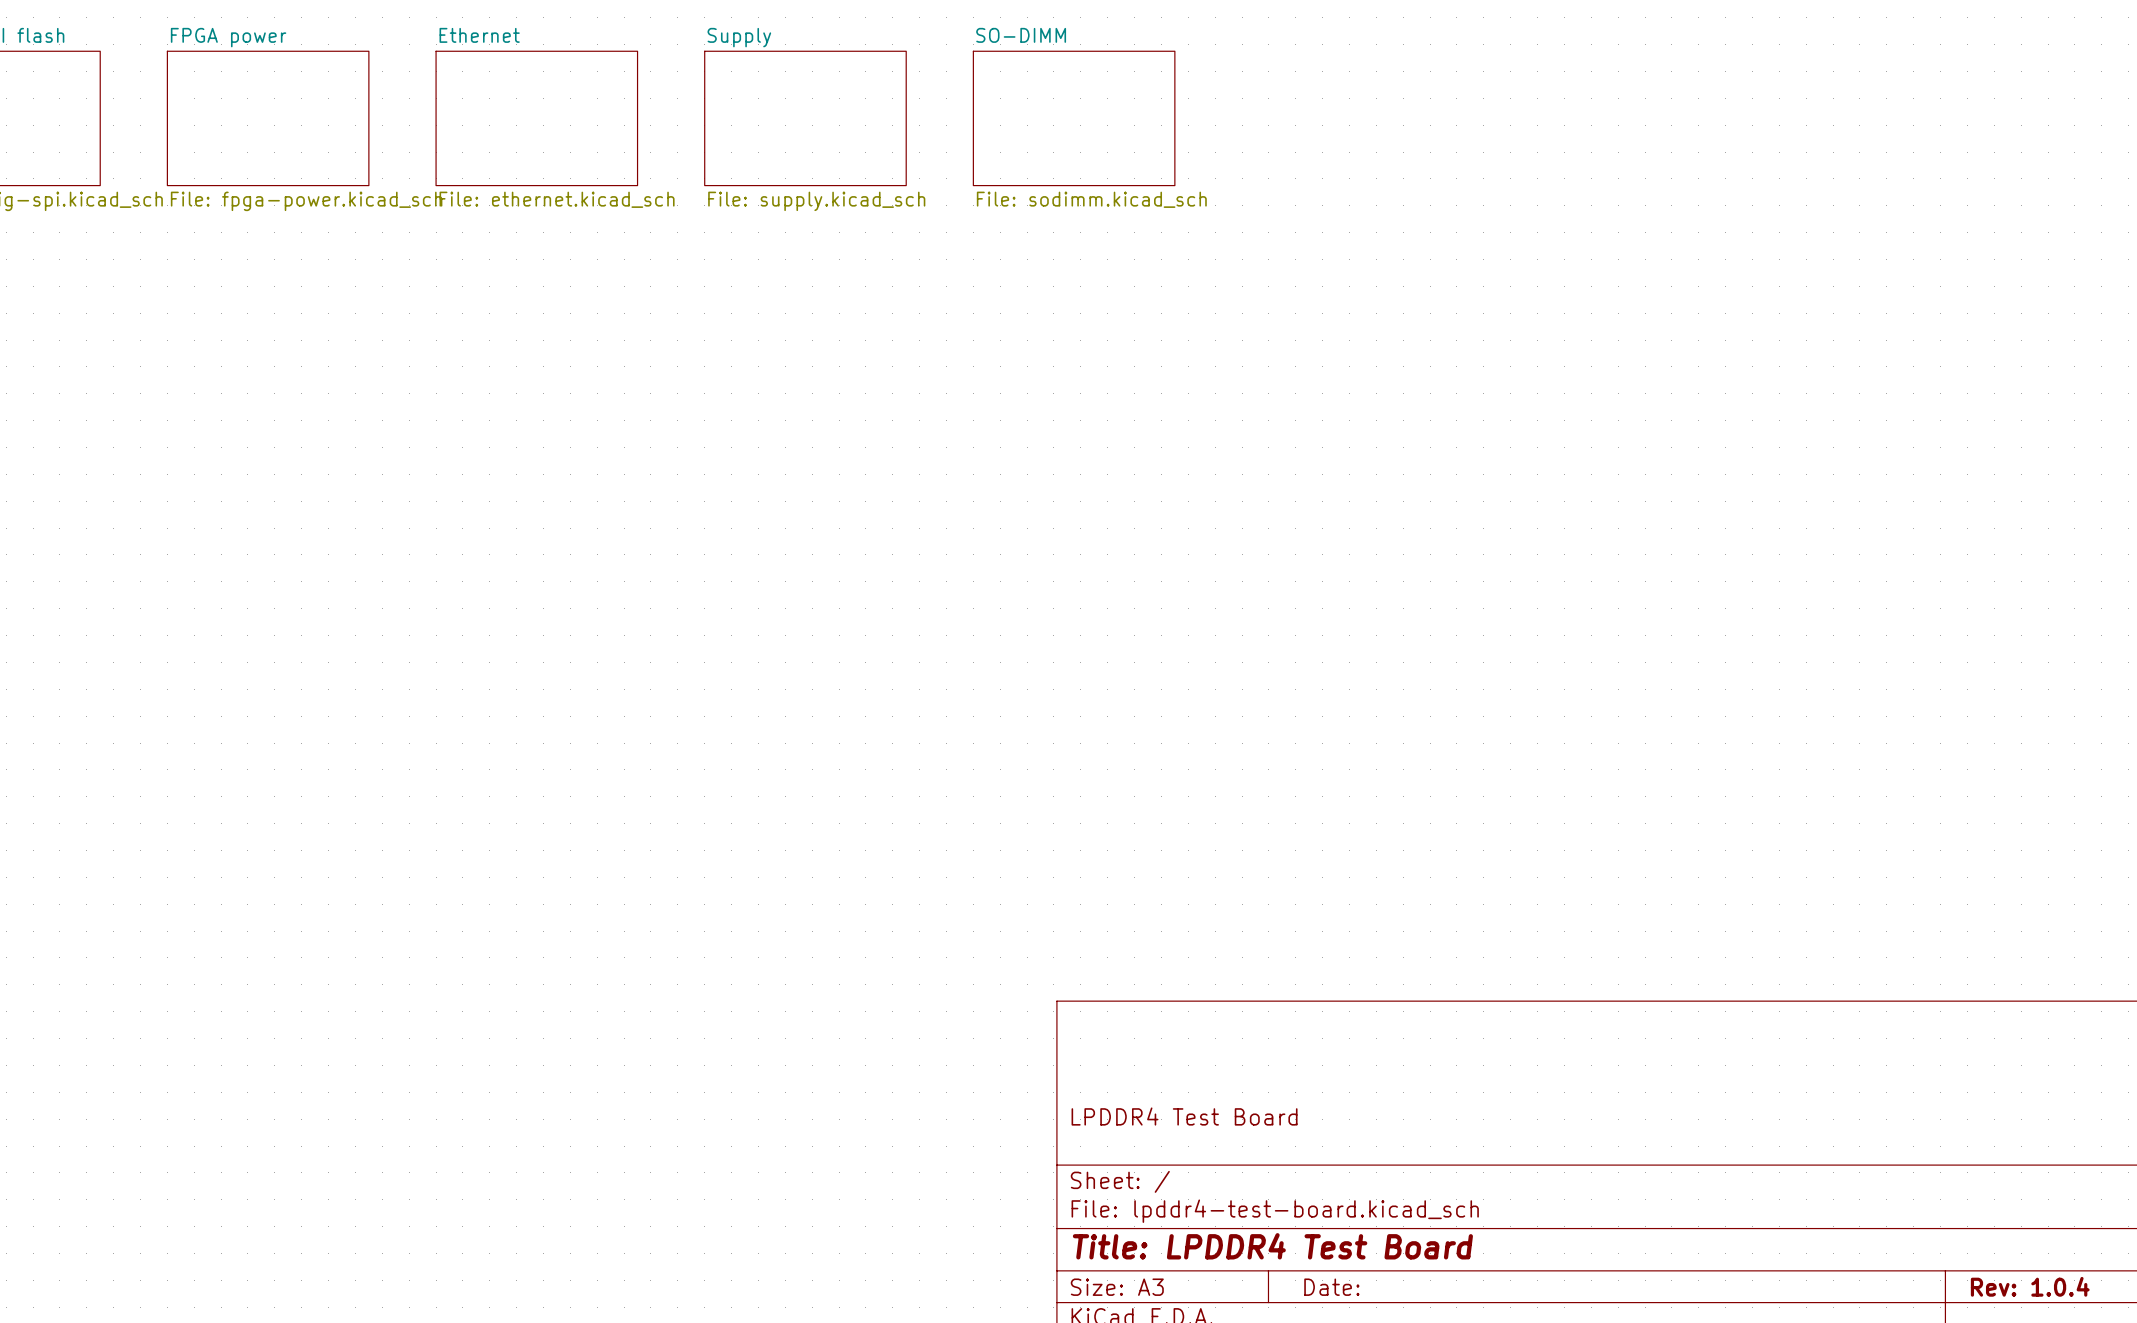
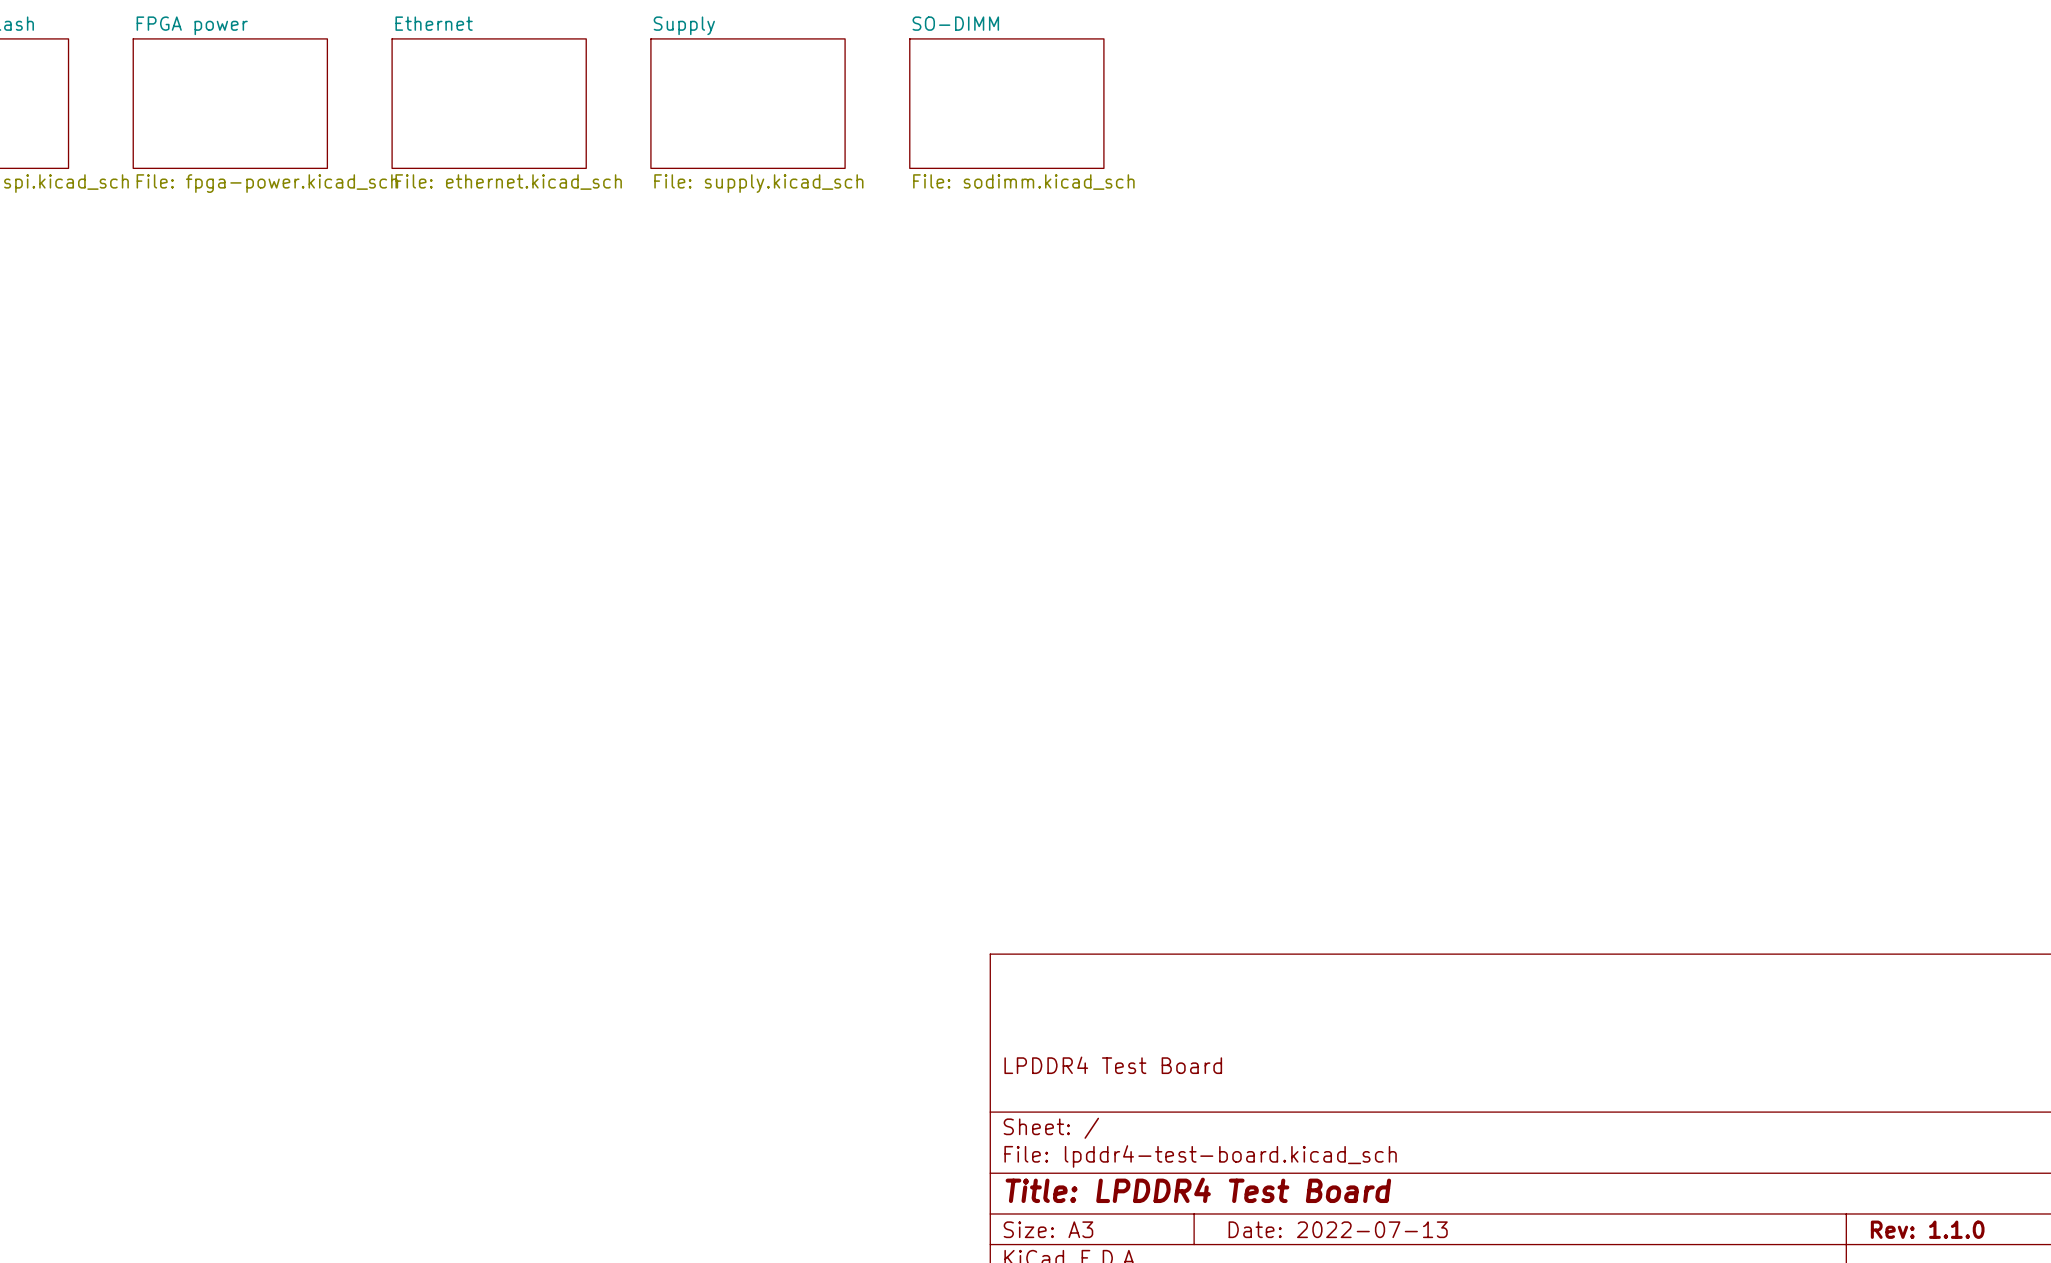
title block: Rev: 1.0.4 (2030, 1286) -> Rev: 1.1.0 (1927, 1229)
title block: Date: (1331, 1287) -> Date: 2022-07-13 (1338, 1229)

